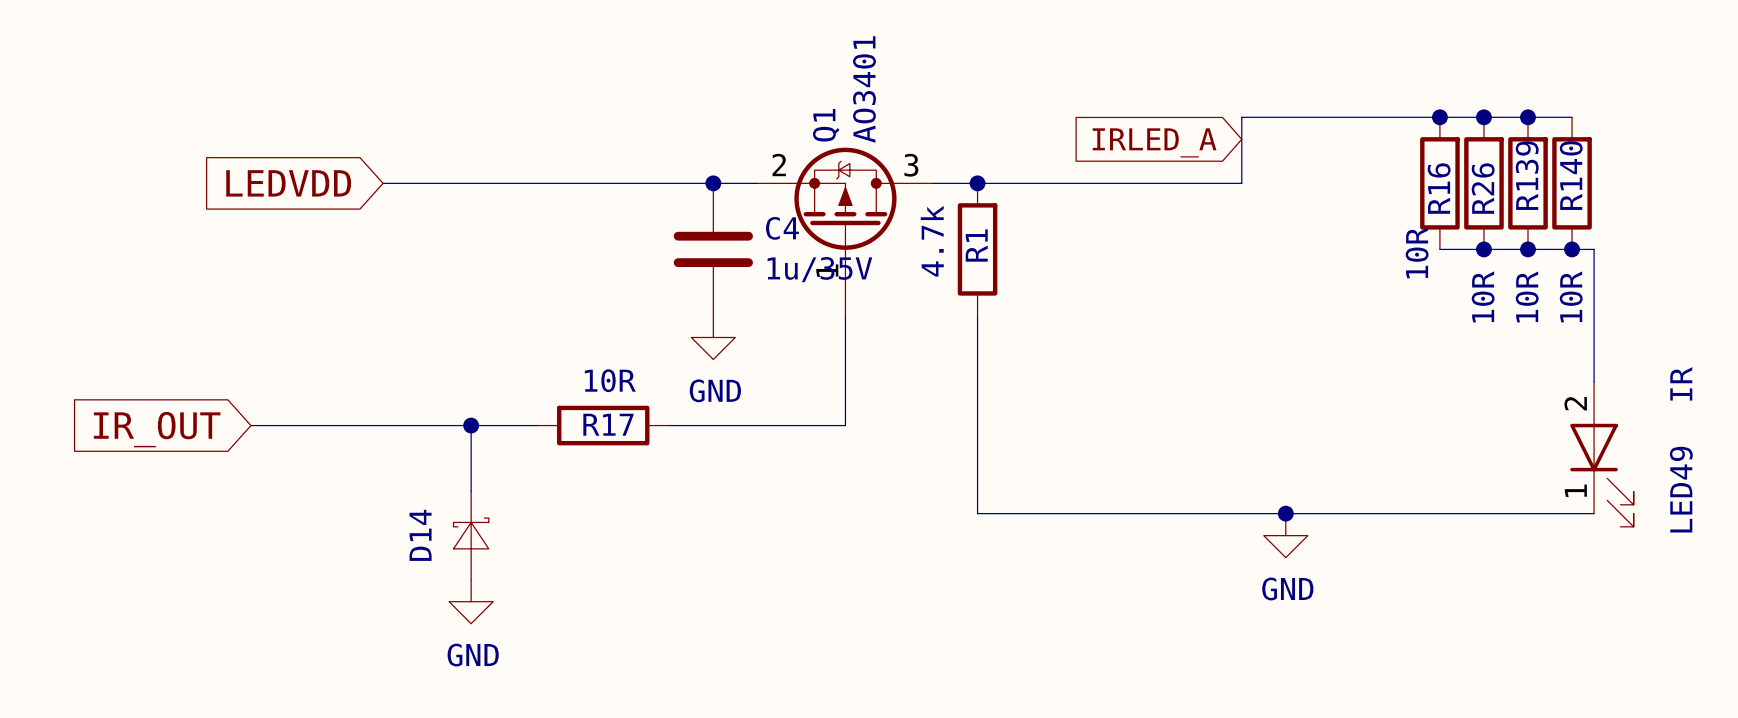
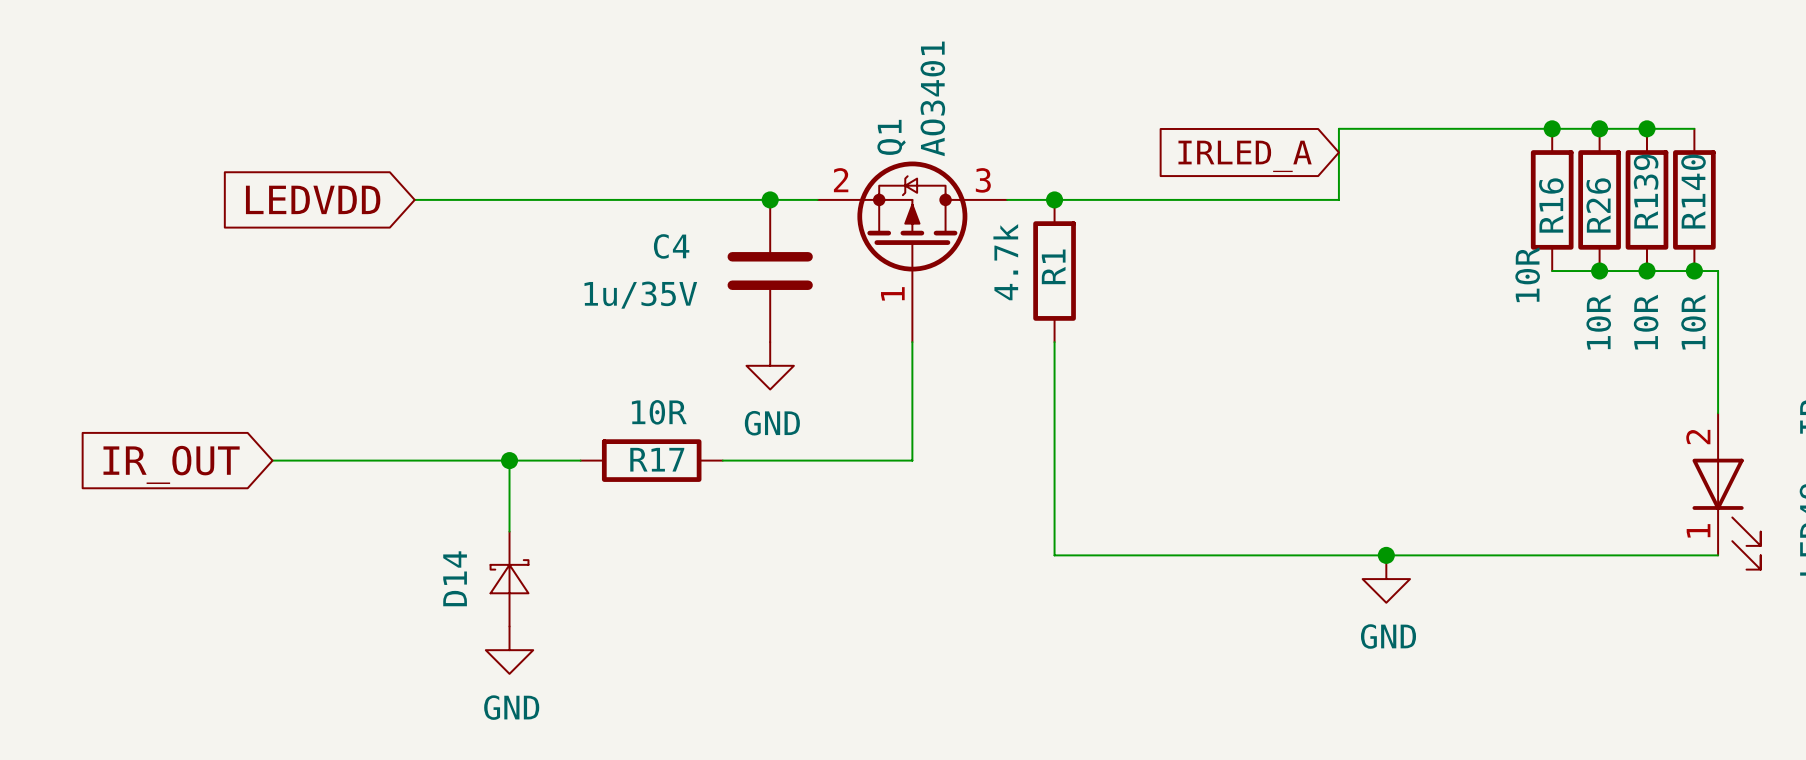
C4 name position: C4 (782, 228) -> C4 (671, 246)
C4 value position: 1u/35V (819, 269) -> 1u/35V (640, 295)

